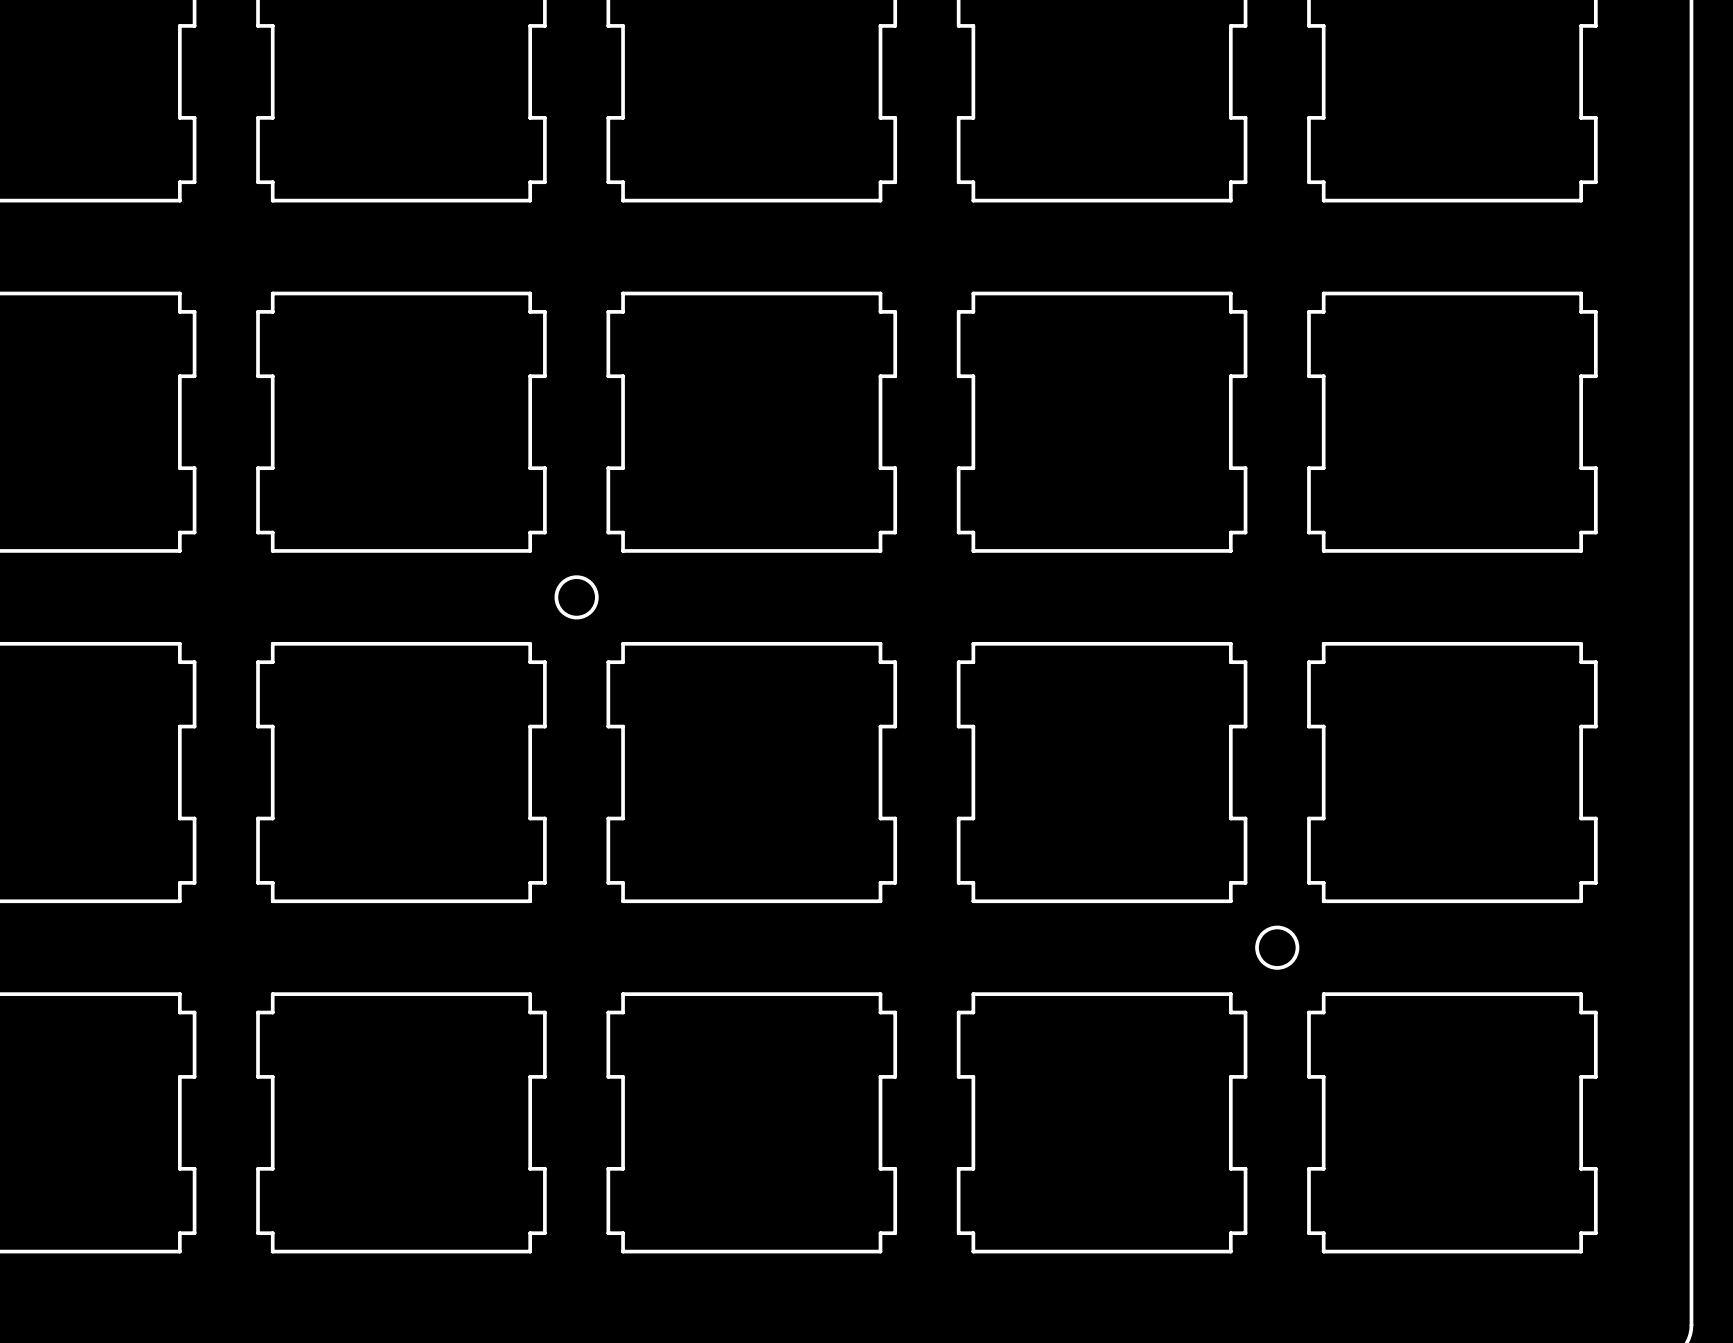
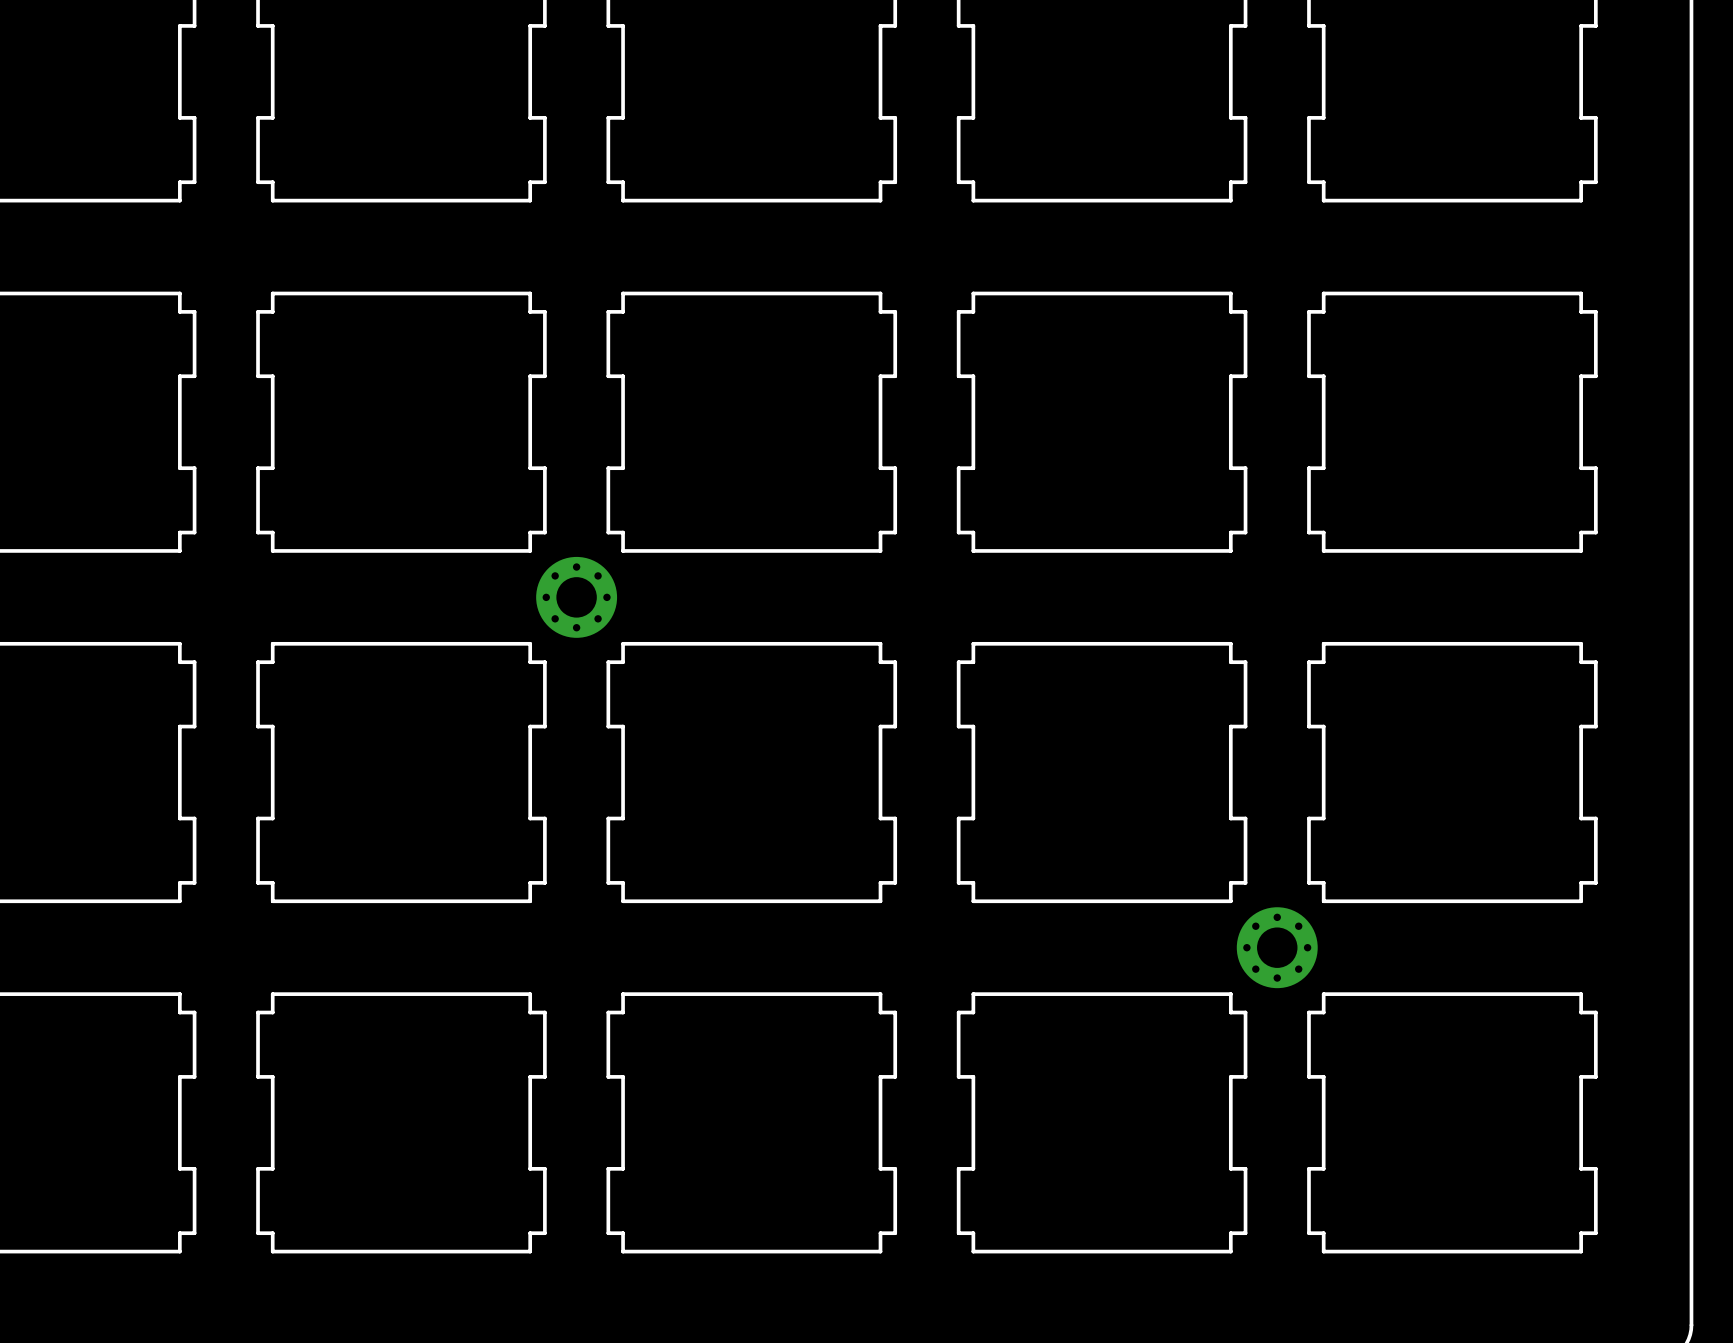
round board edge: [554, 575, 599, 620] -> none
part: none -> (576, 597)
round board edge: [1255, 925, 1300, 970] -> none
part: none -> (1277, 947)

